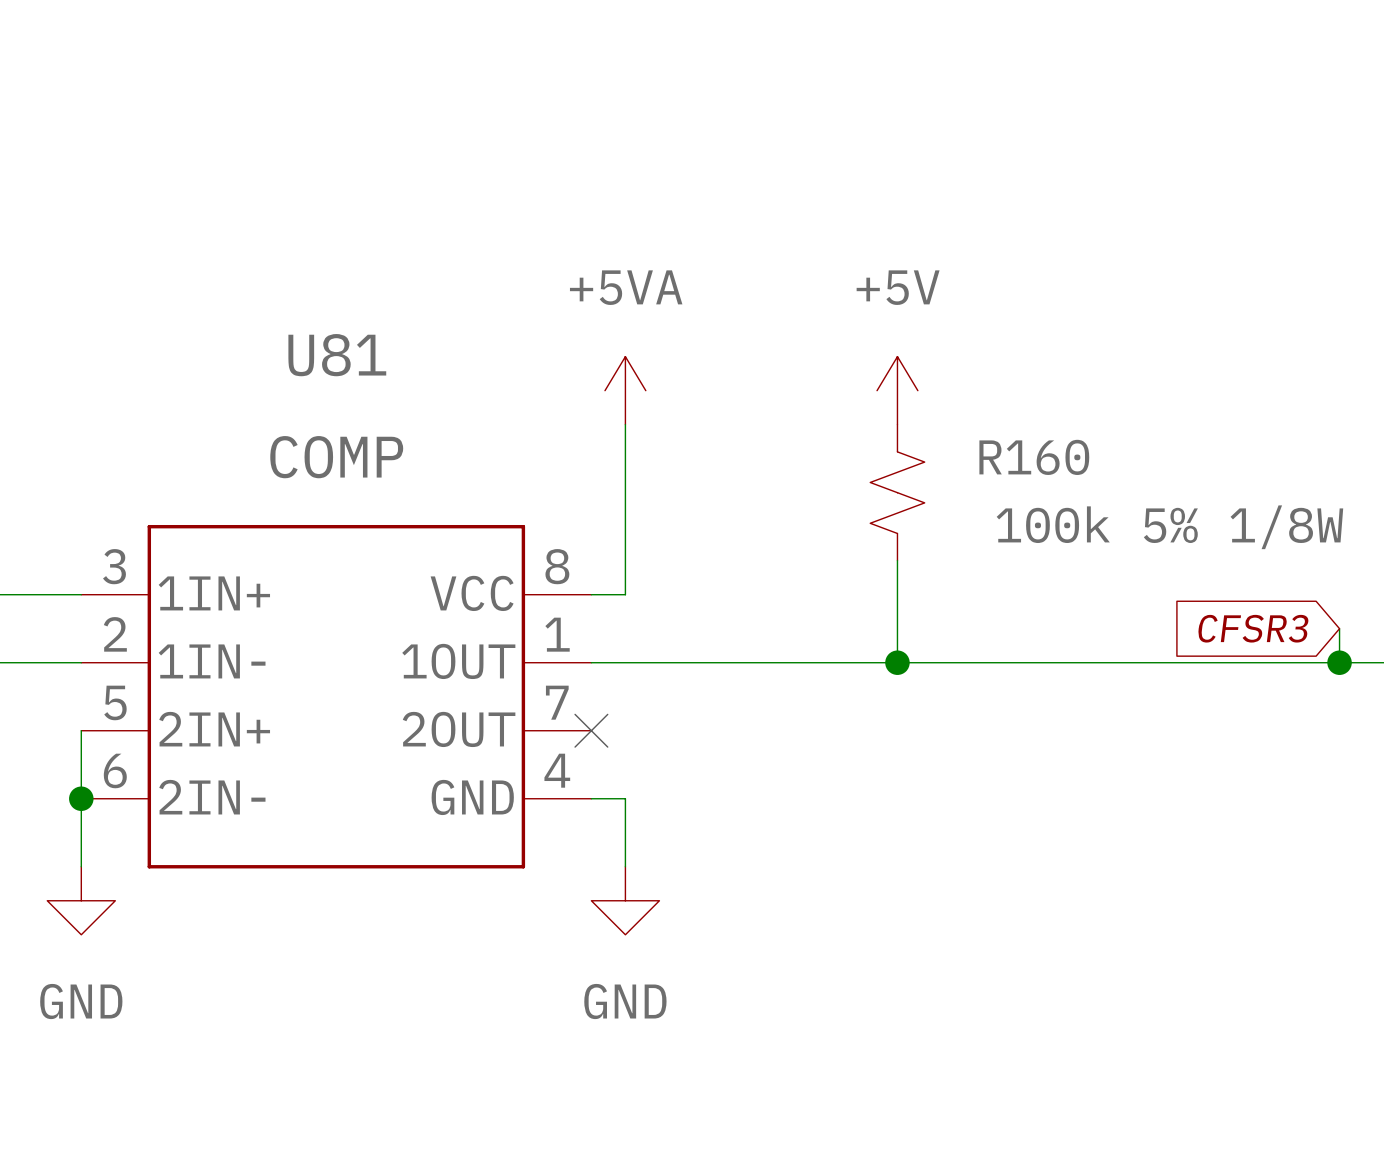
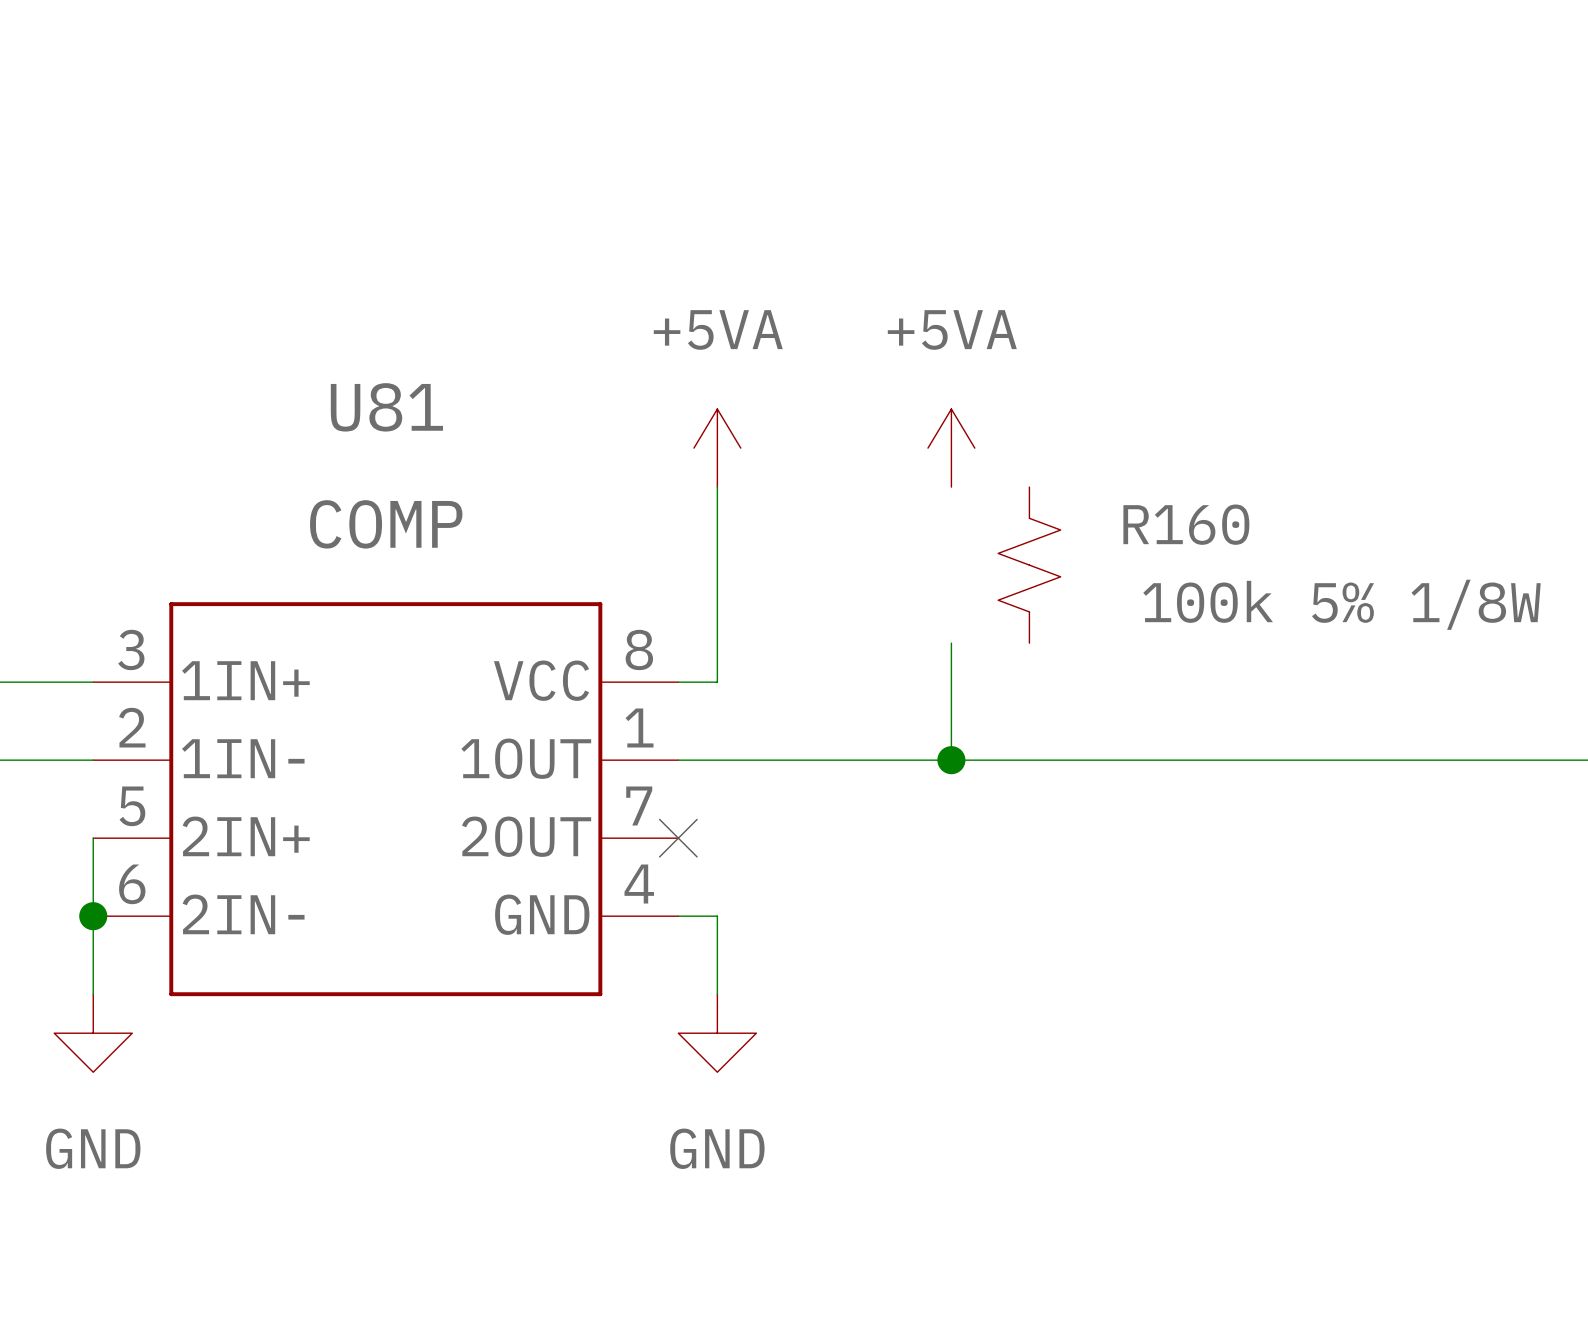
power symbol: none -> +5VA (951, 448)
power symbol: +5V (897, 390) -> none
wire: (897, 560) (897, 662) -> (951, 643) (951, 760)
global label: CFSR3 (1253, 628) -> none
wire: (1339, 628) (1339, 662) -> none
junction position: (897, 662) -> (951, 760)
junction: (1339, 662) -> none

